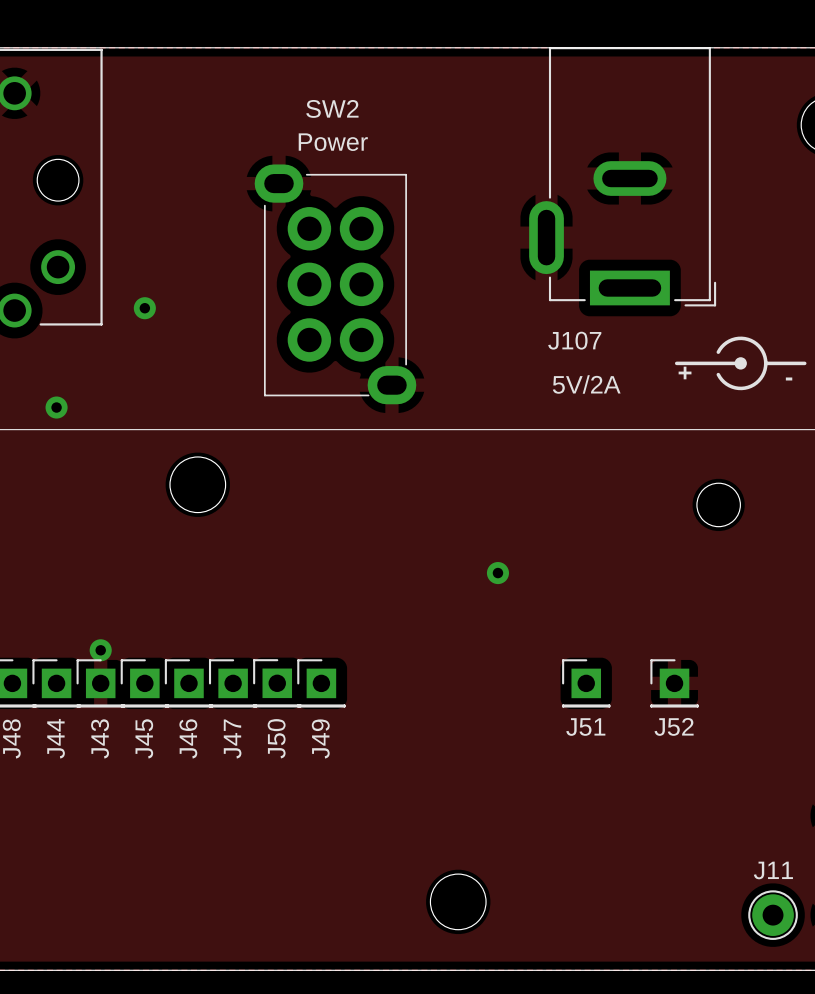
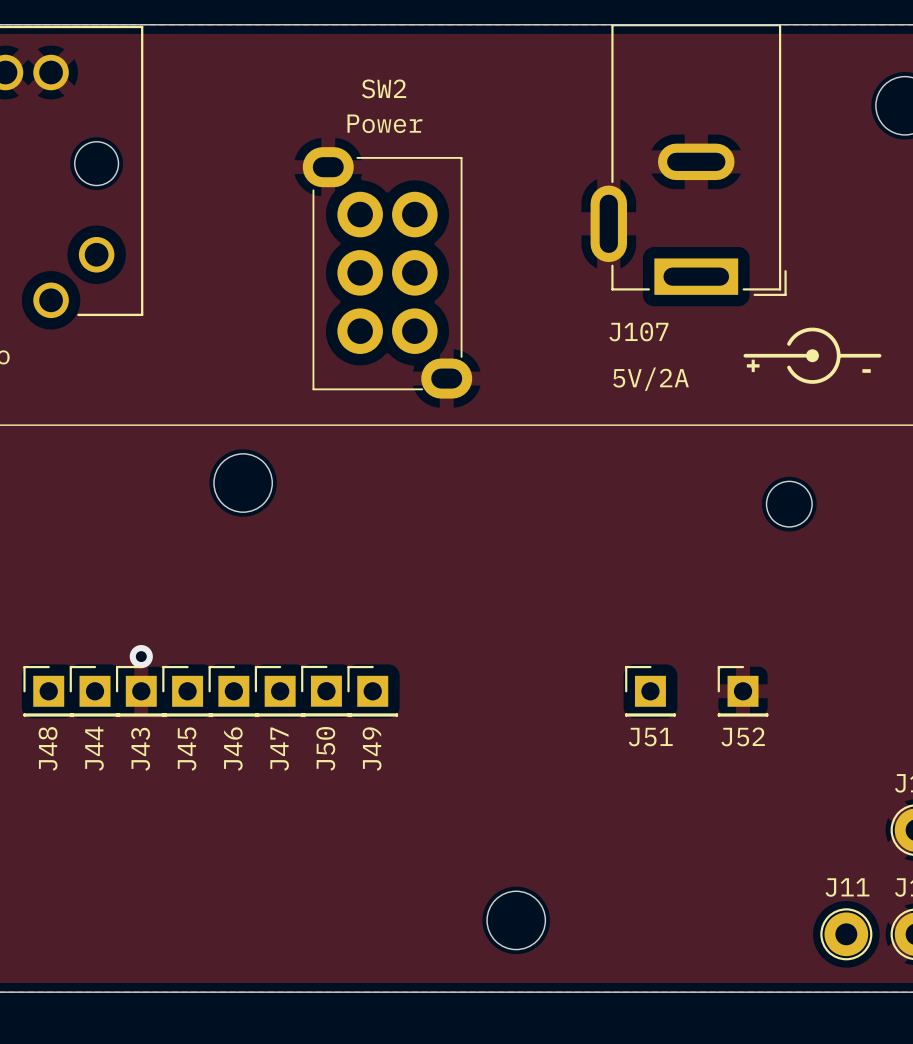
via: (144, 308) -> none
via: (56, 407) -> none
via: (497, 573) -> none

